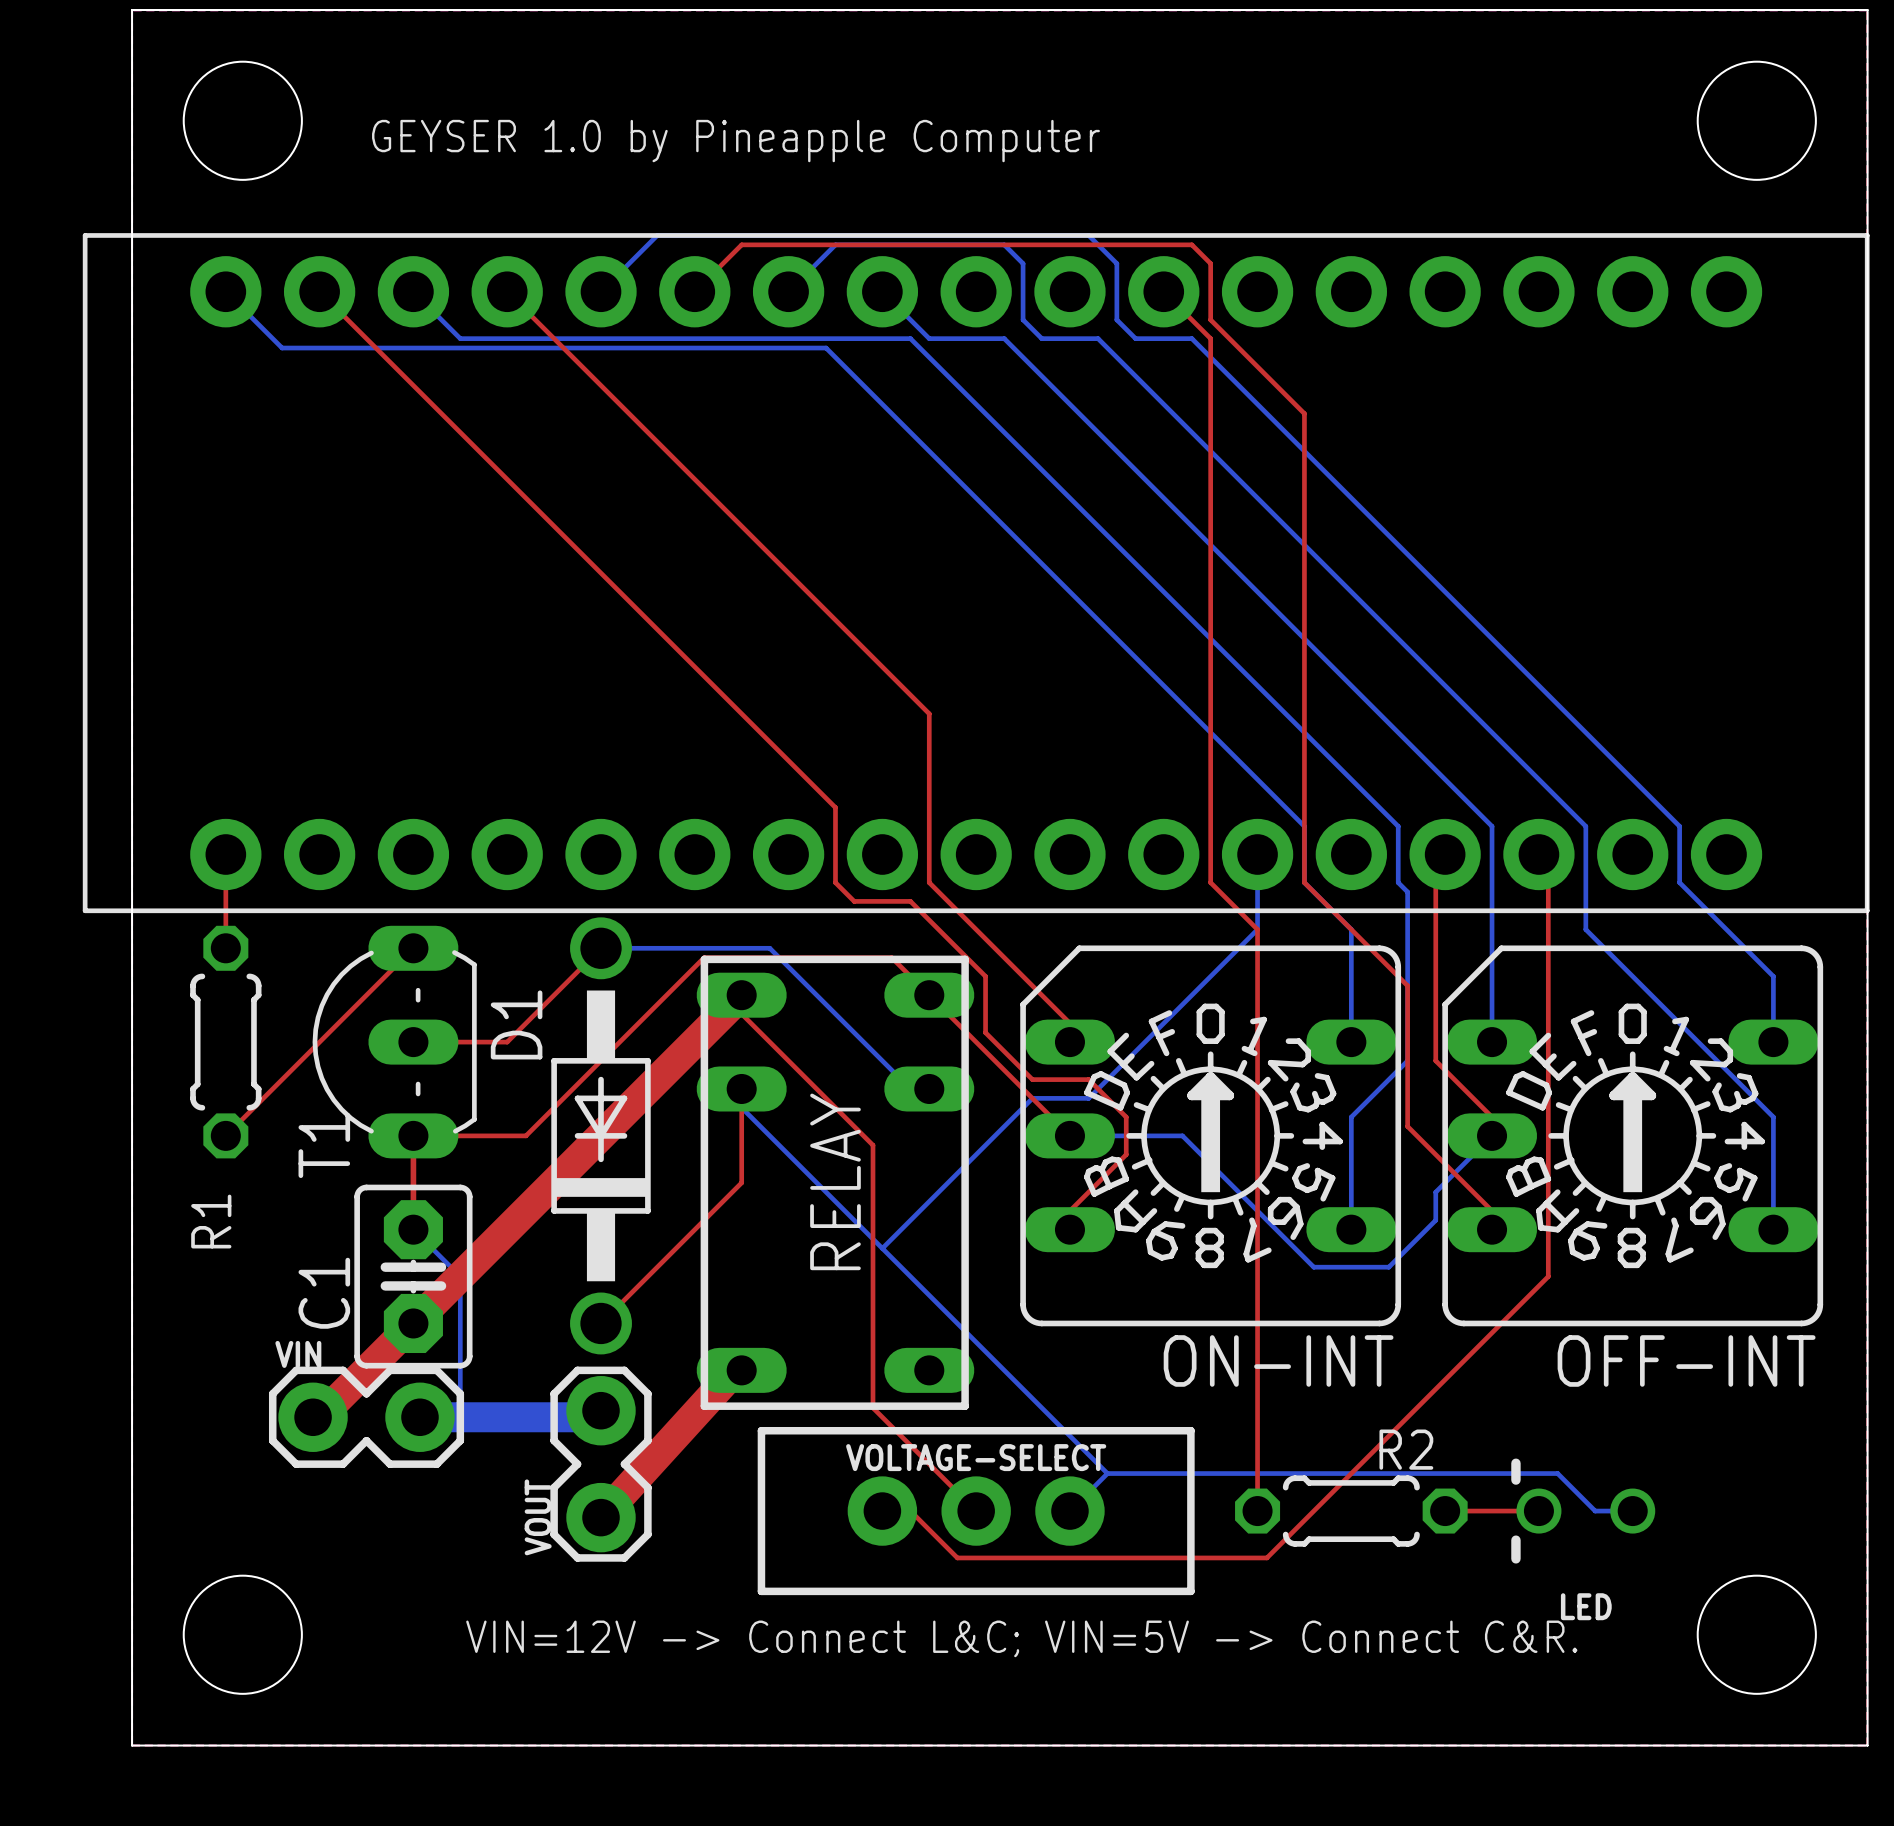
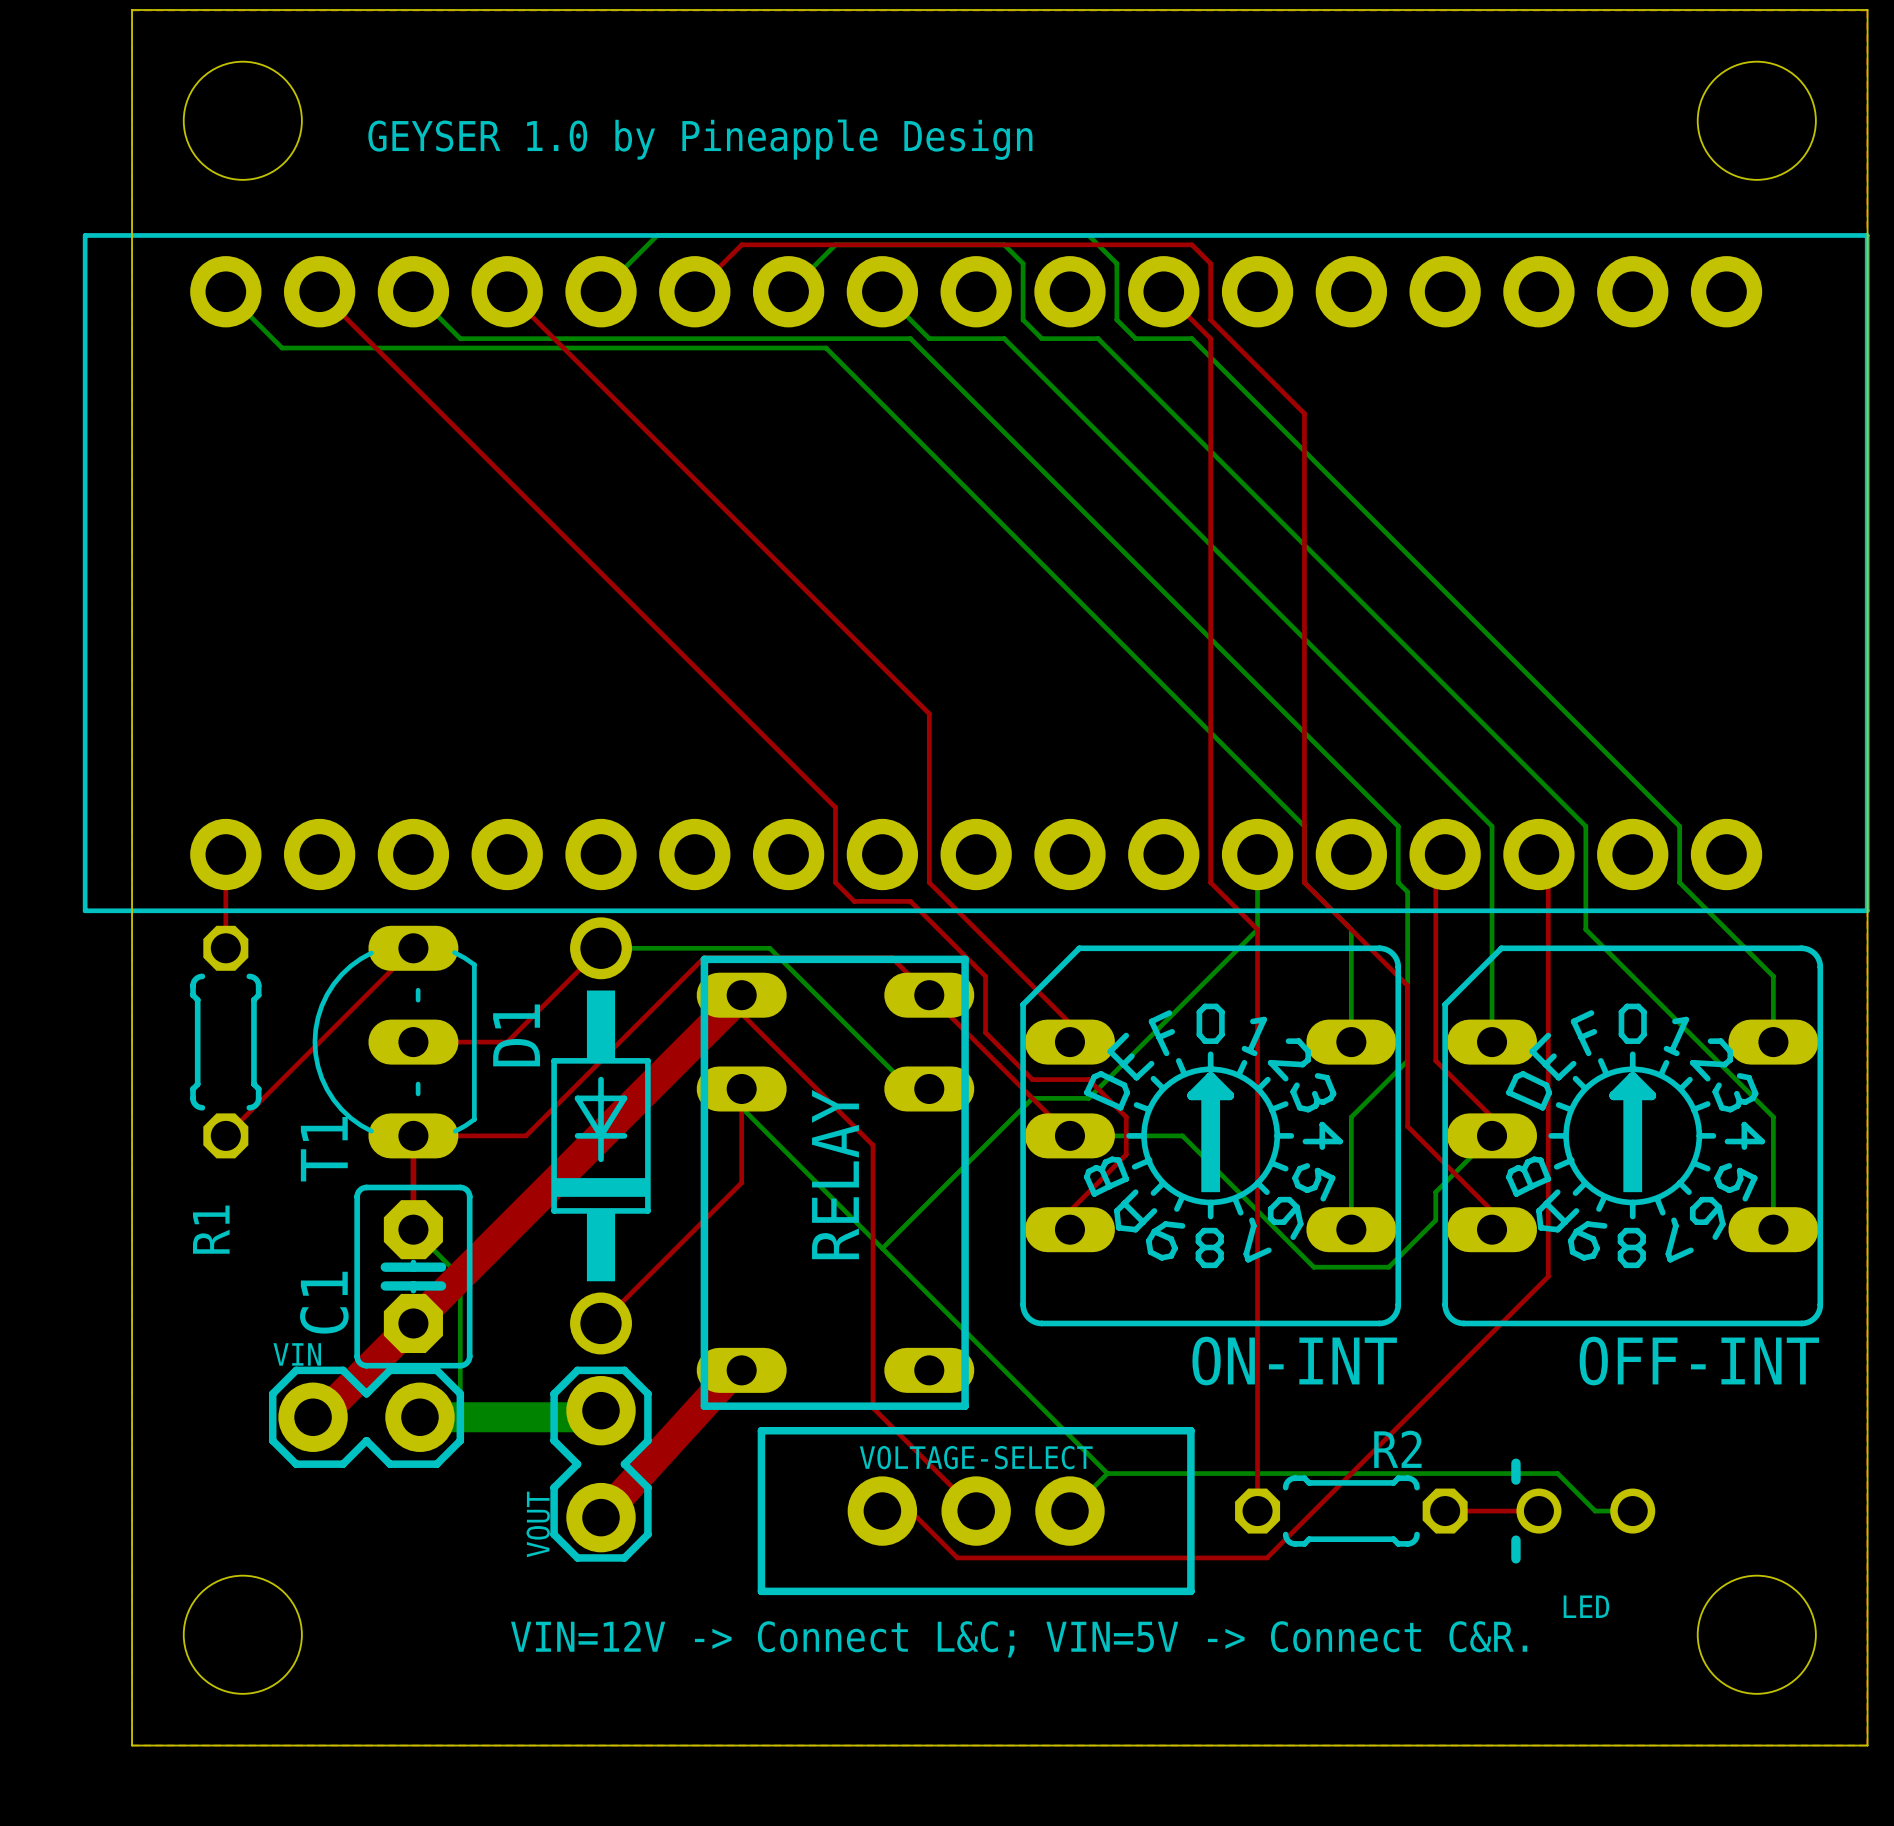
text: GEYSER 1.0 by Pineapple Computer (735, 141) -> GEYSER 1.0 by Pineapple Design (700, 139)

